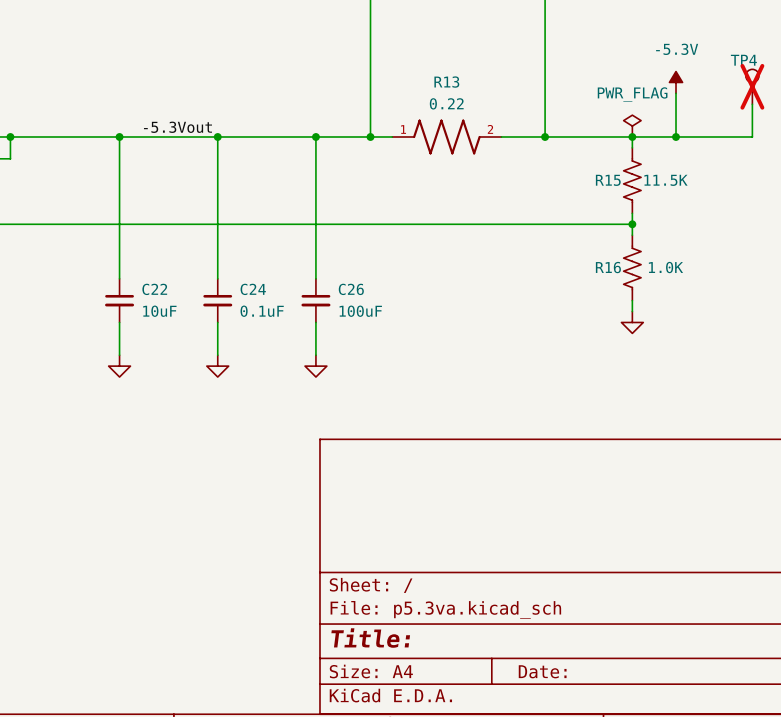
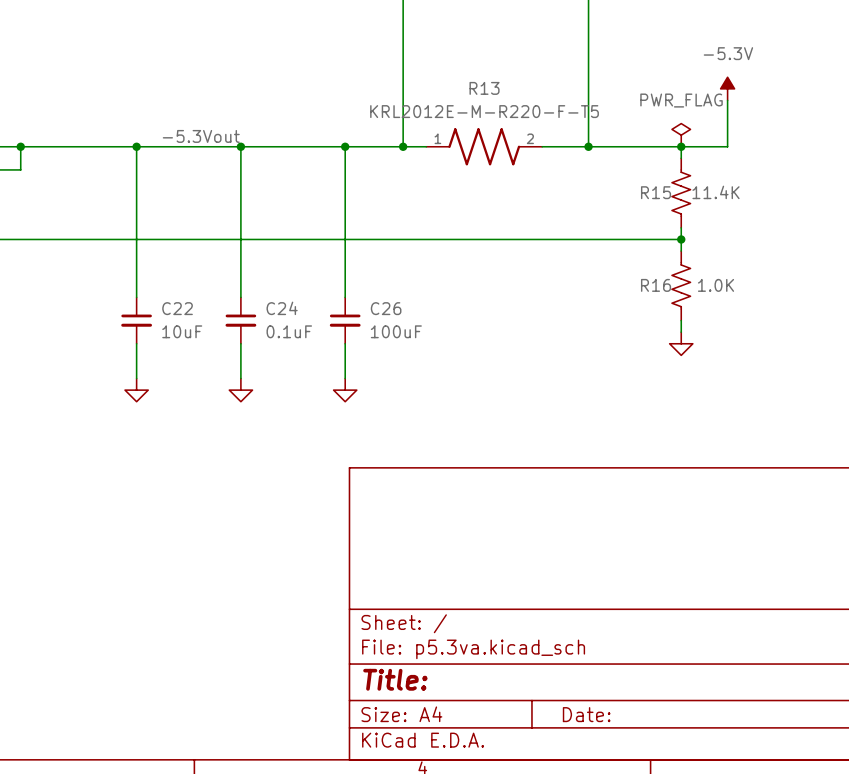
TP4: (752, 86) -> none
R13 value: 0.22 (446, 103) -> KRL2012E-M-R220-F-T5 (484, 111)
wire: (752, 104) (752, 136) (676, 136) -> none
junction: (676, 136) -> none
R15 value: 11.5K (665, 180) -> 11.4K (716, 192)

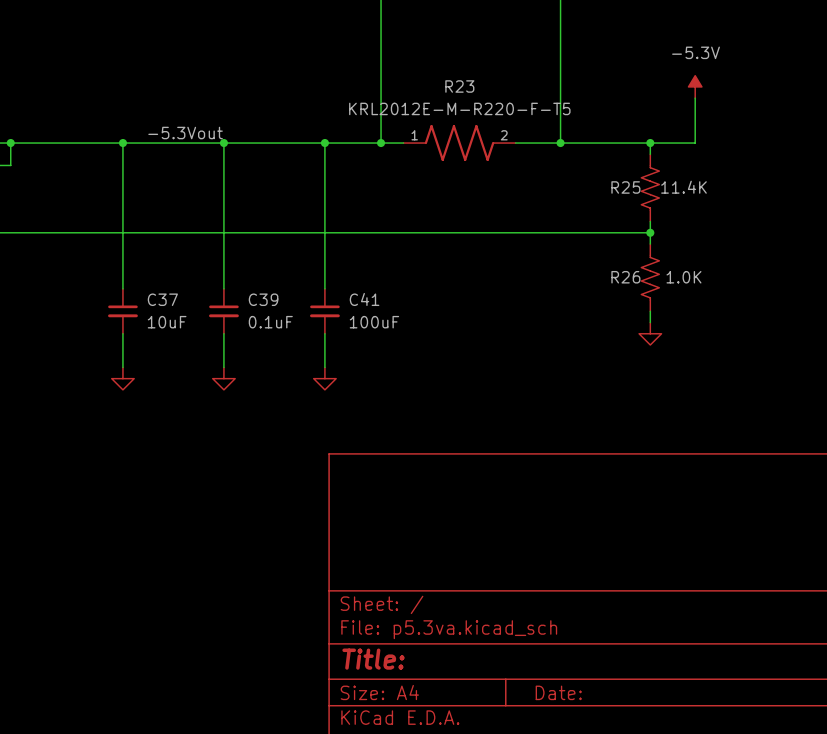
R13 name: R13 (484, 88) -> R23 (459, 86)
power symbol: PWR_FLAG (681, 135) -> none
R15 name: R15 (656, 192) -> R25 (625, 187)
R16 name: R16 (656, 285) -> R26 (625, 277)
C22 name: C22 (177, 308) -> C37 (162, 299)
C24 name: C24 (282, 308) -> C39 (263, 299)
C26 name: C26 (386, 308) -> C41 (364, 299)

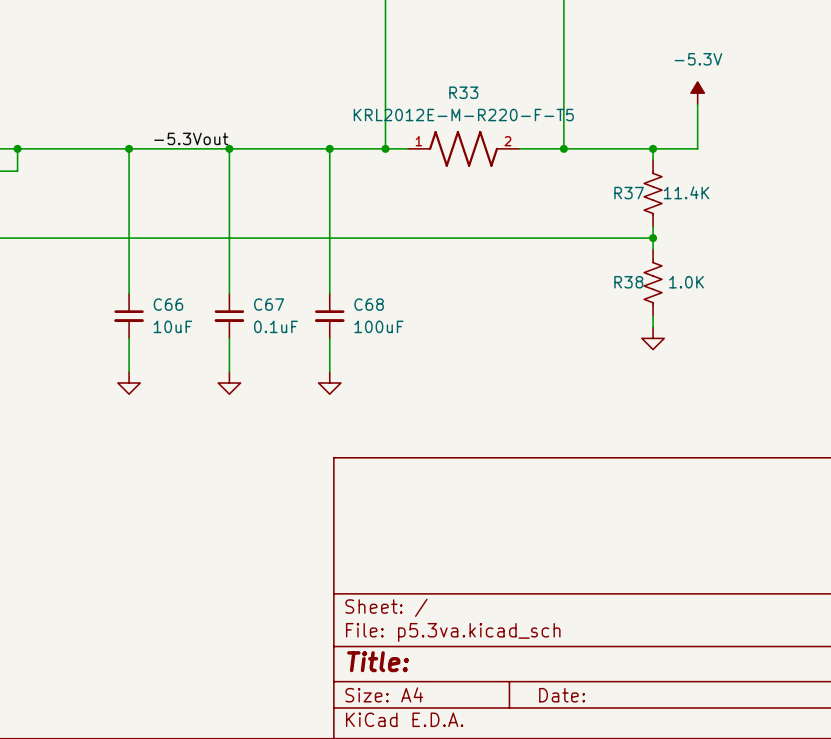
R23 name: R23 (459, 86) -> R33 (463, 92)
R25 name: R25 (625, 187) -> R37 (629, 193)
R26 name: R26 (625, 277) -> R38 (628, 282)
C37 name: C37 (162, 299) -> C66 (168, 304)
C39 name: C39 (263, 299) -> C67 (269, 304)
C41 name: C41 (364, 299) -> C68 (369, 304)

